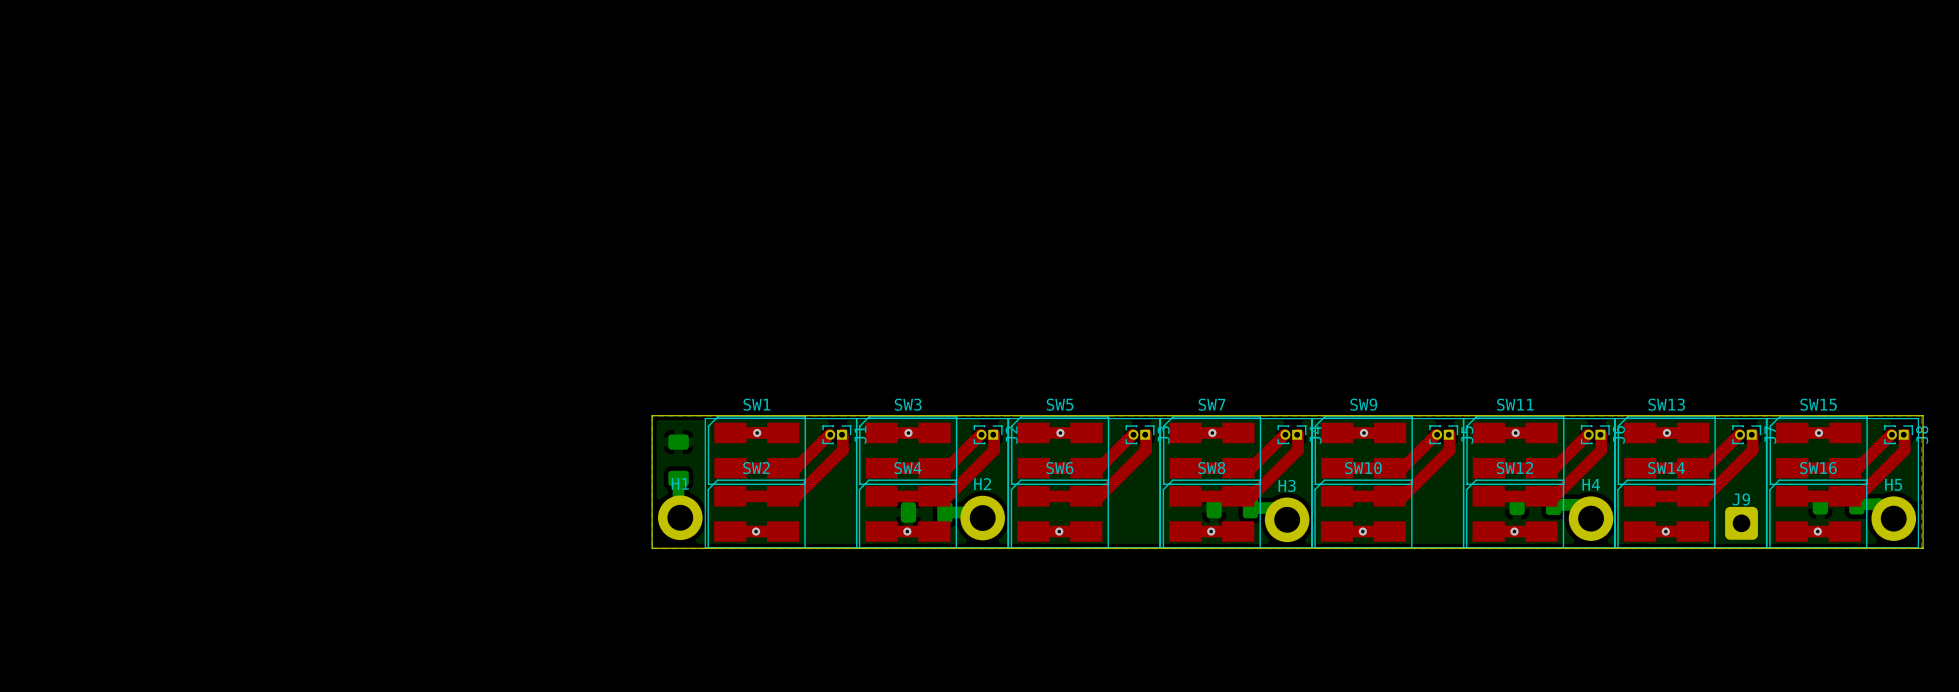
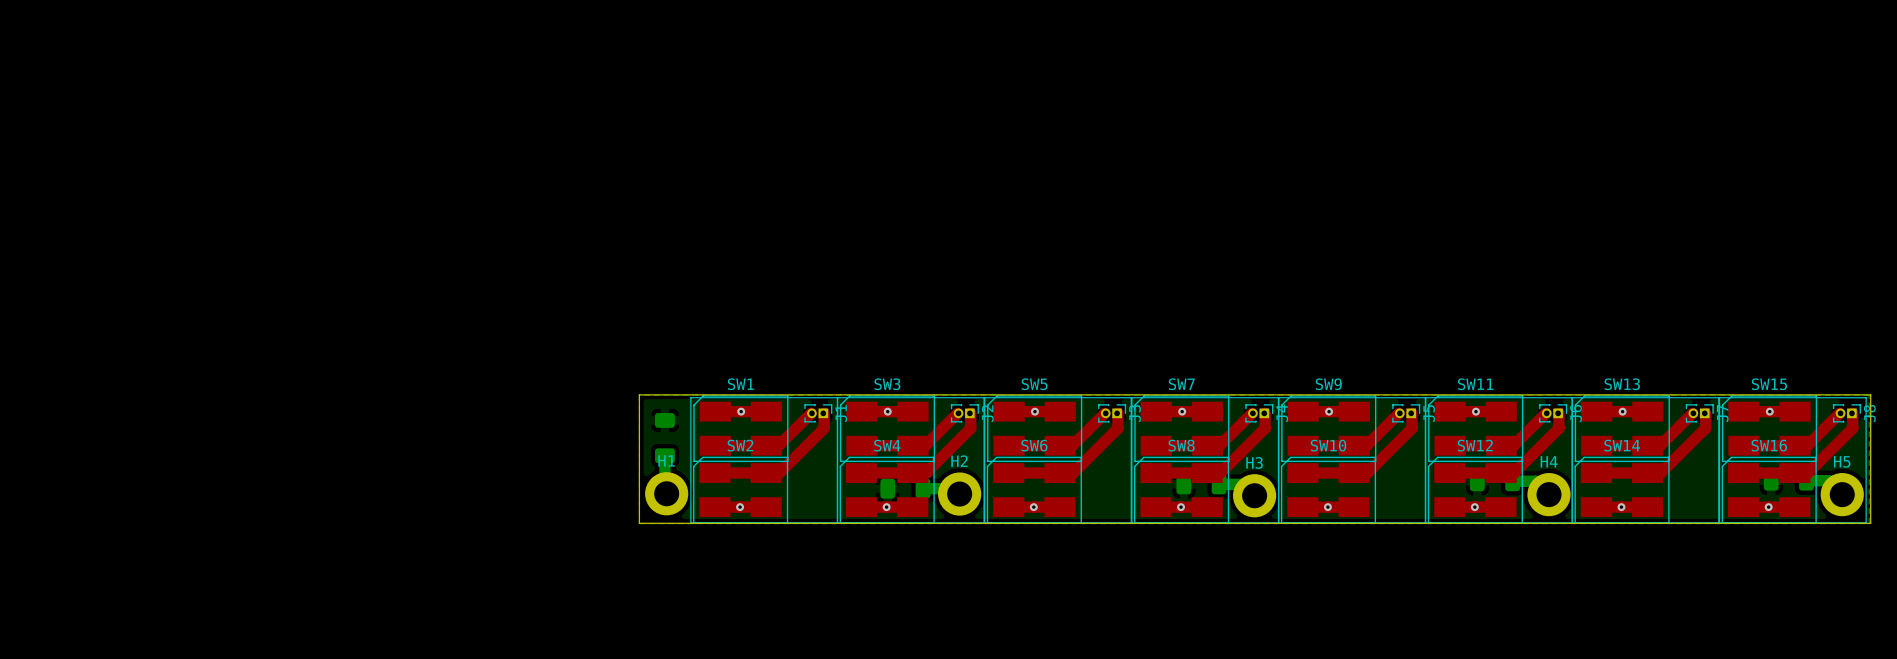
J9: (1741, 523) -> none

